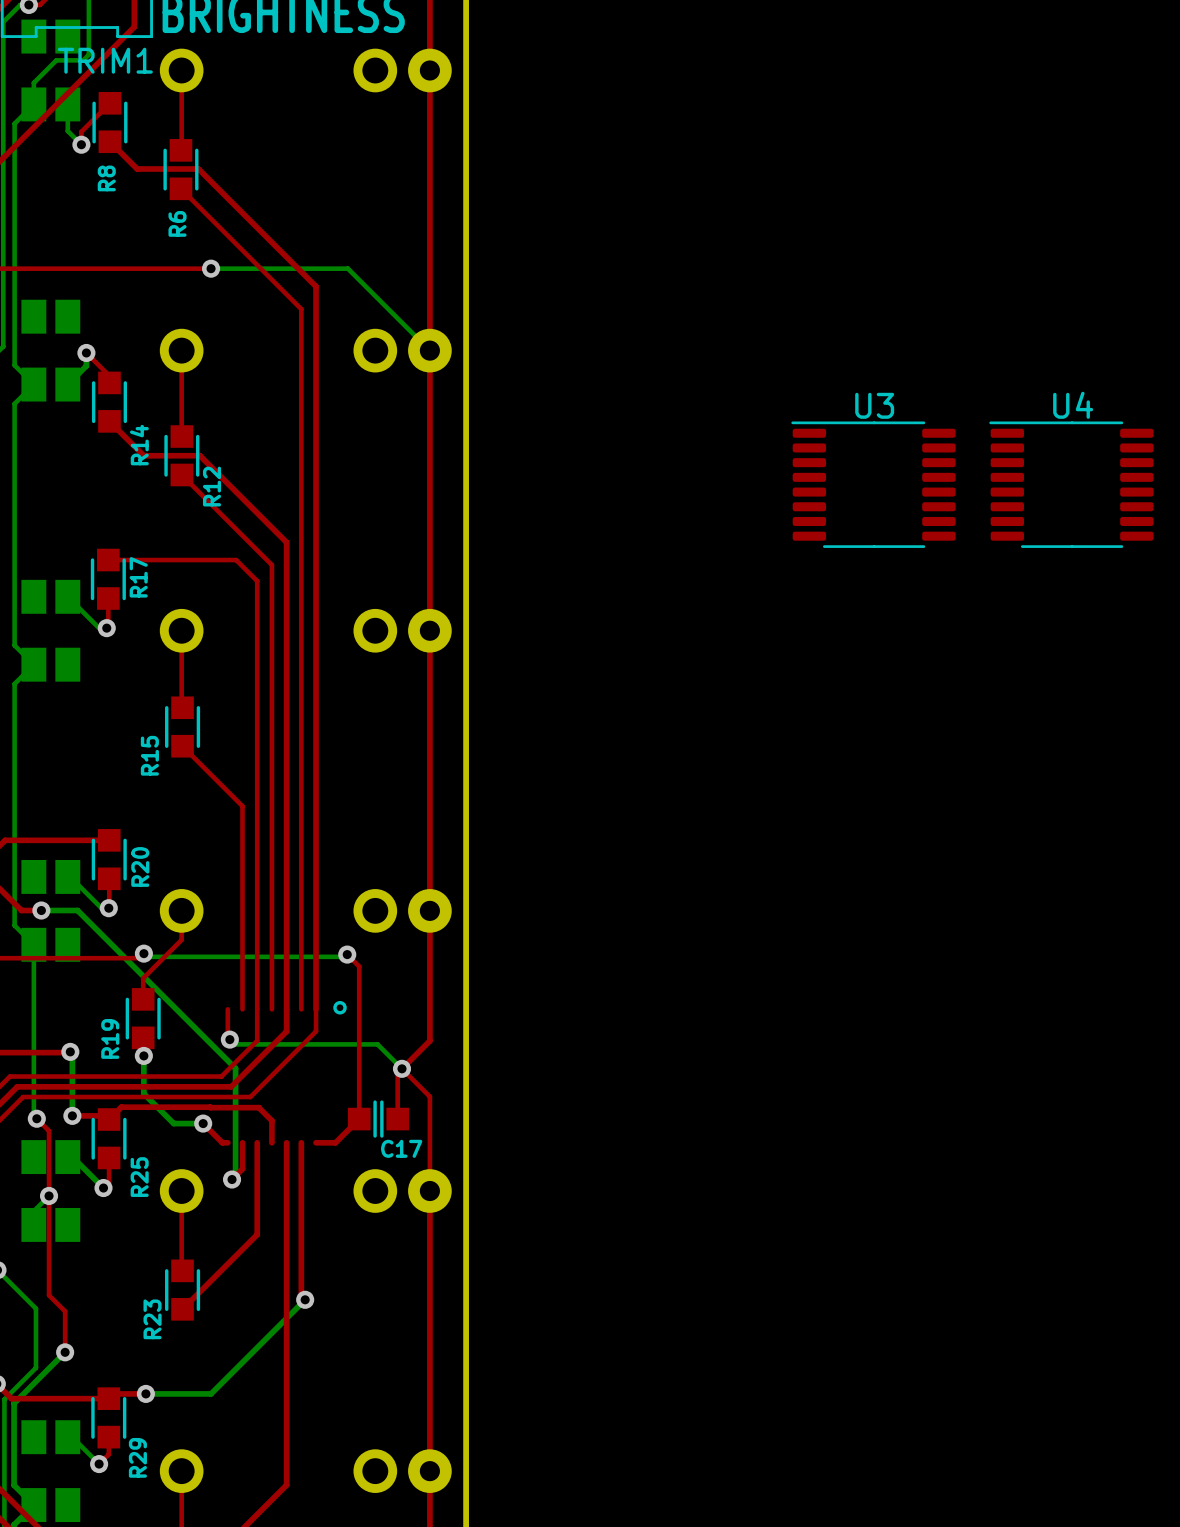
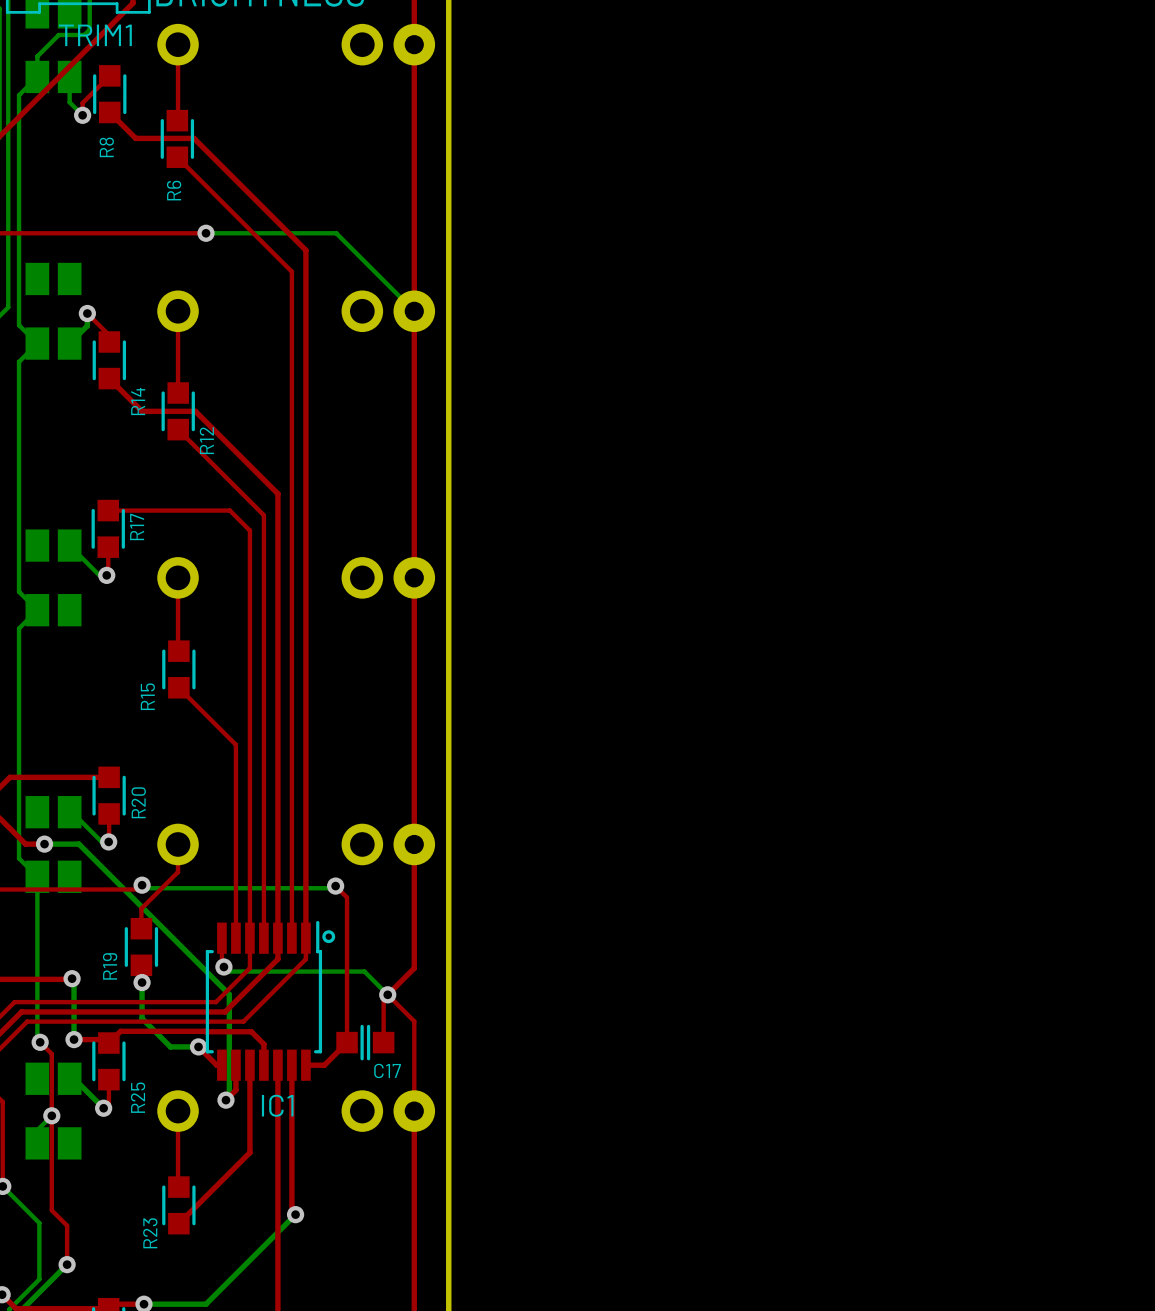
U3: (873, 484) -> none
U4: (1071, 484) -> none
IC1: none -> (263, 1000)

